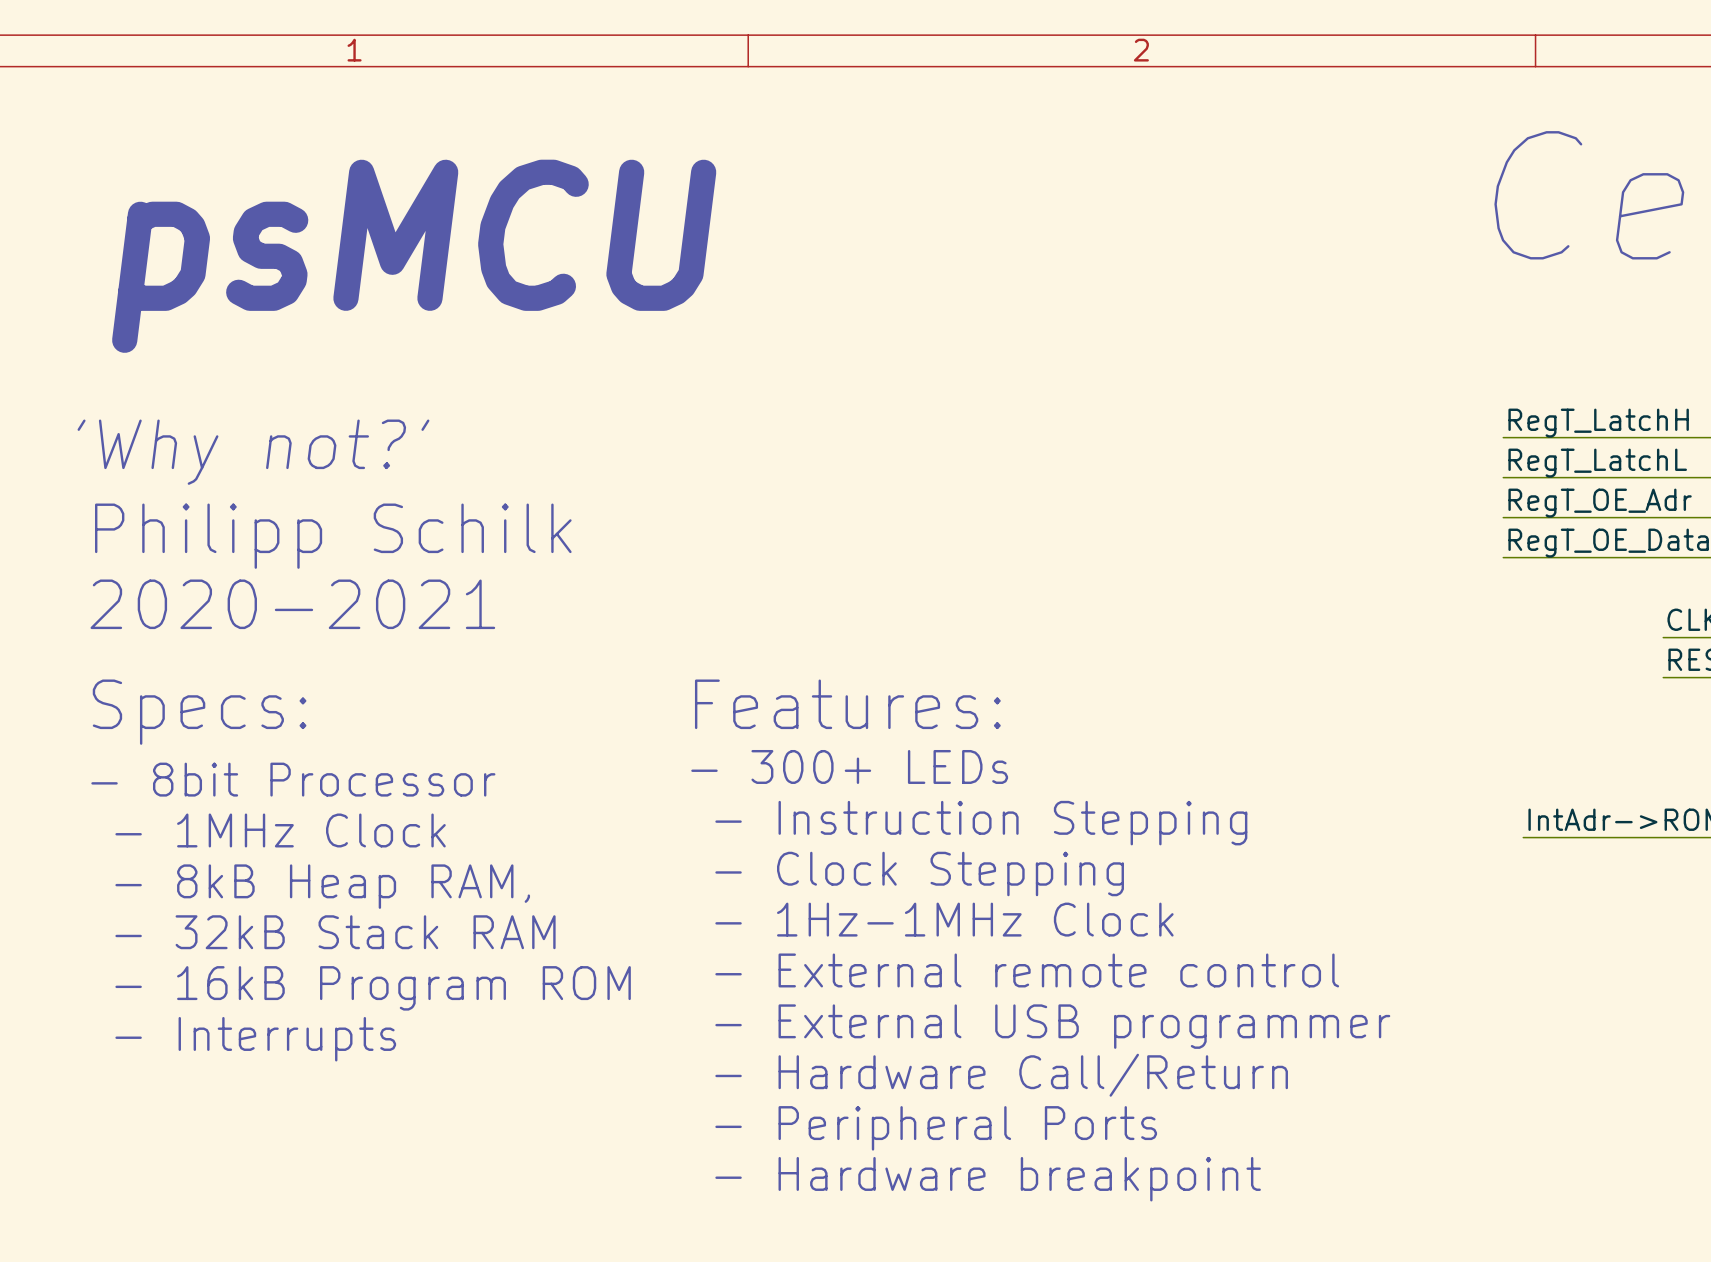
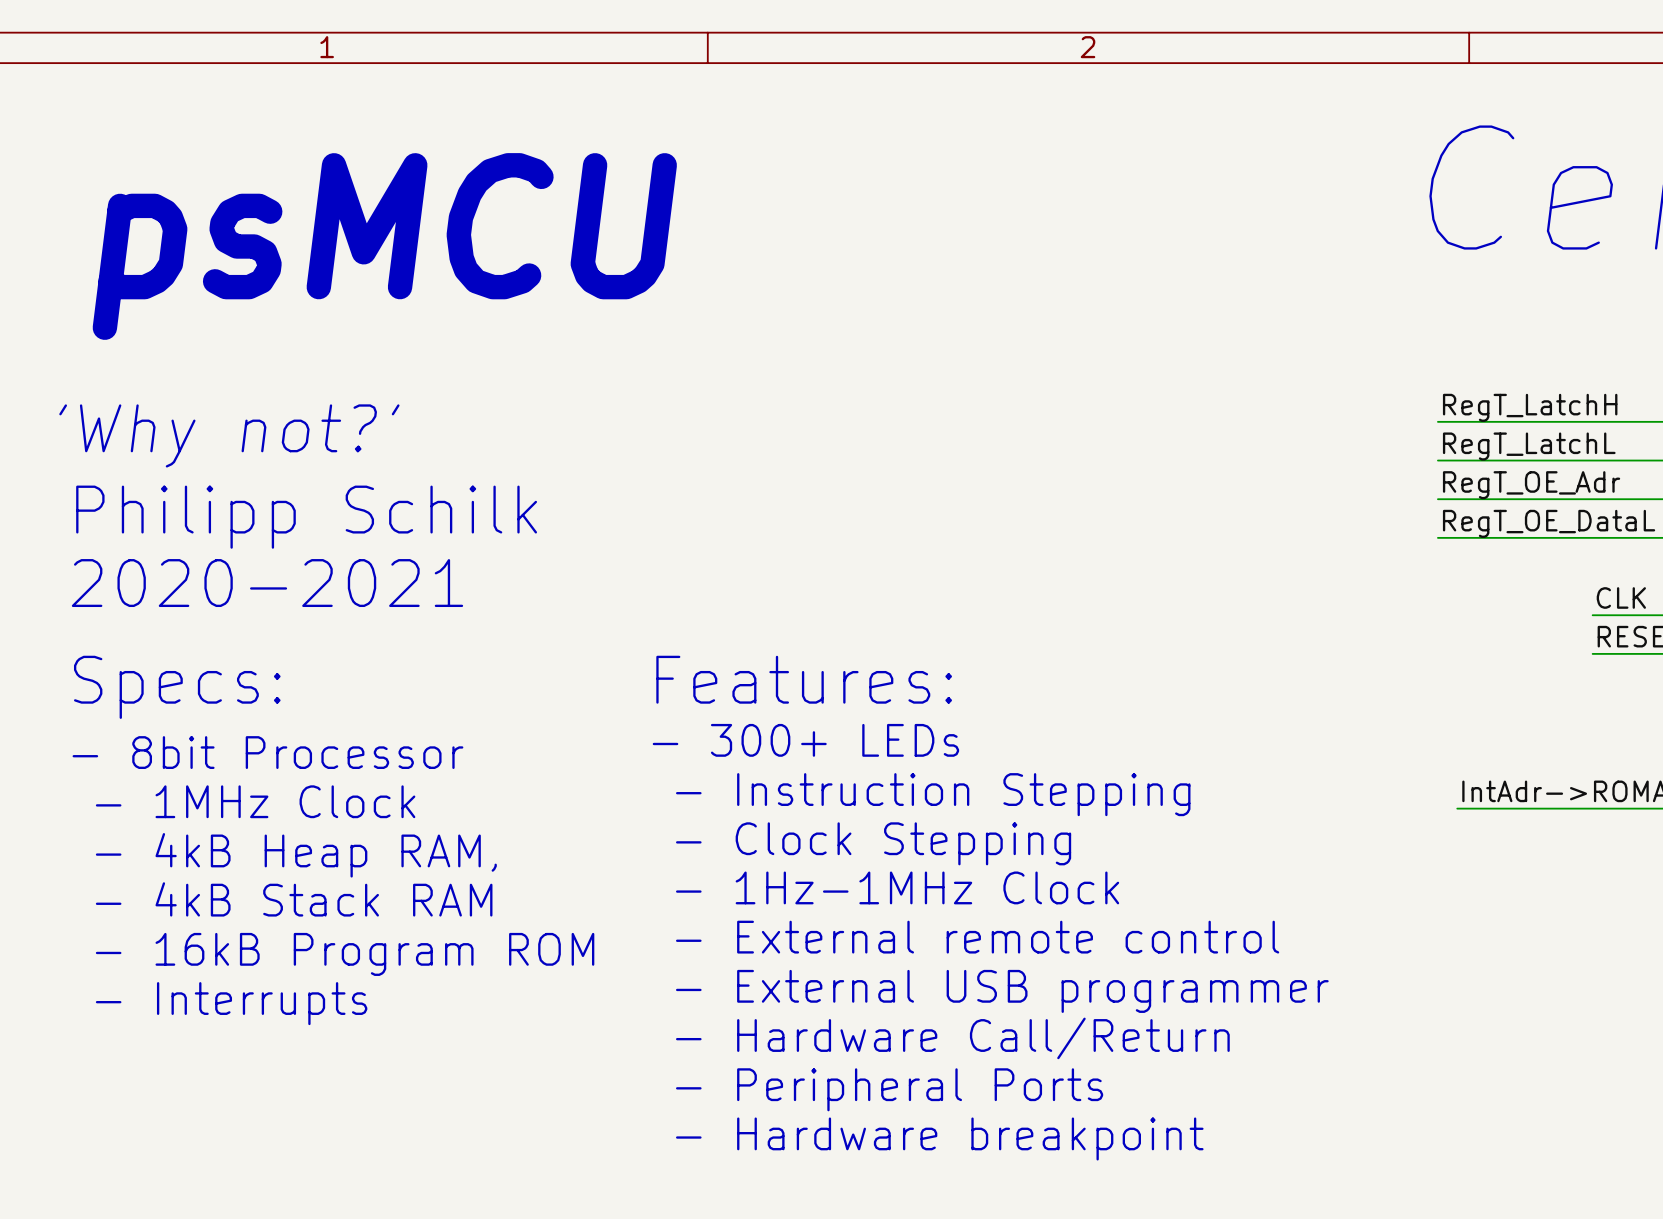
text: - 8kB Heap RAM, (322, 886) -> - 4kB Heap RAM, (296, 855)
text: - 32kB Stack RAM (335, 932) -> - 4kB Stack RAM (294, 899)

